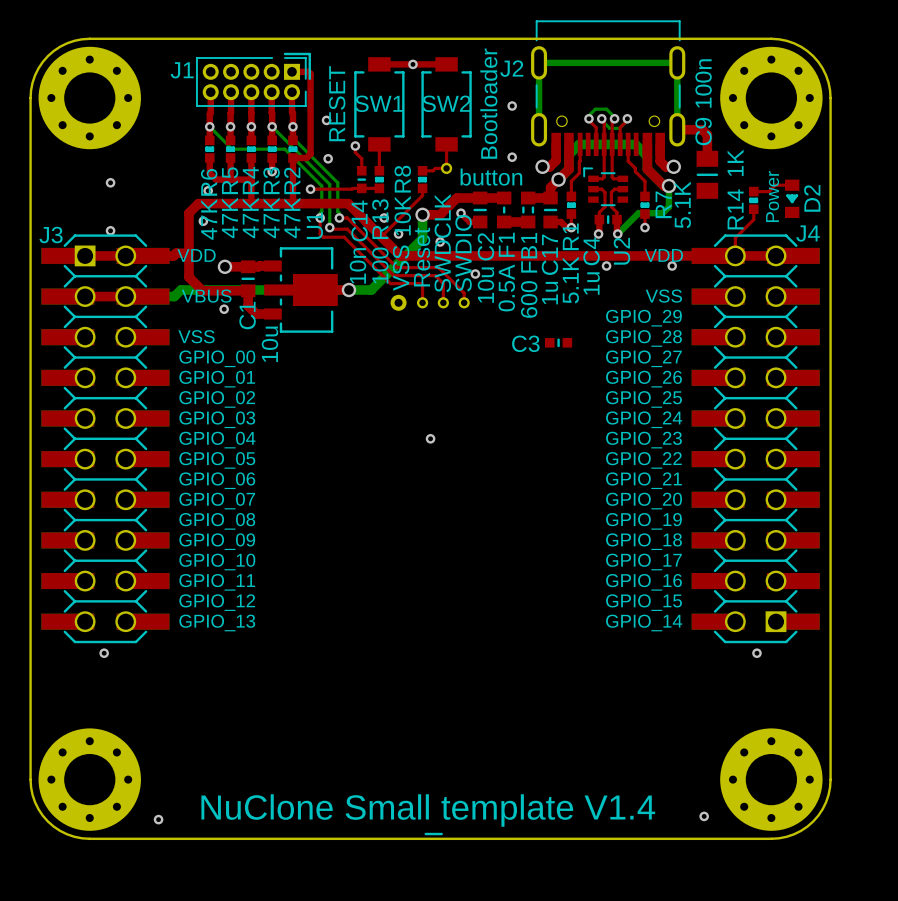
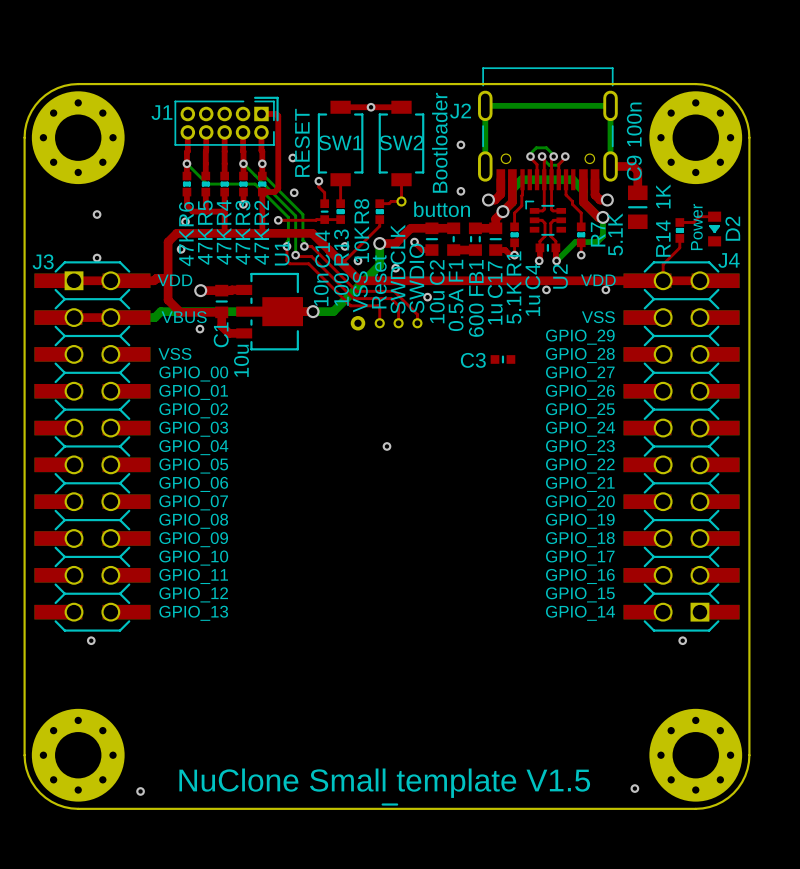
via: (230, 126) -> none
via: (251, 126) -> none
drawing shape: [201, 794, 656, 836] -> [179, 768, 591, 806]

